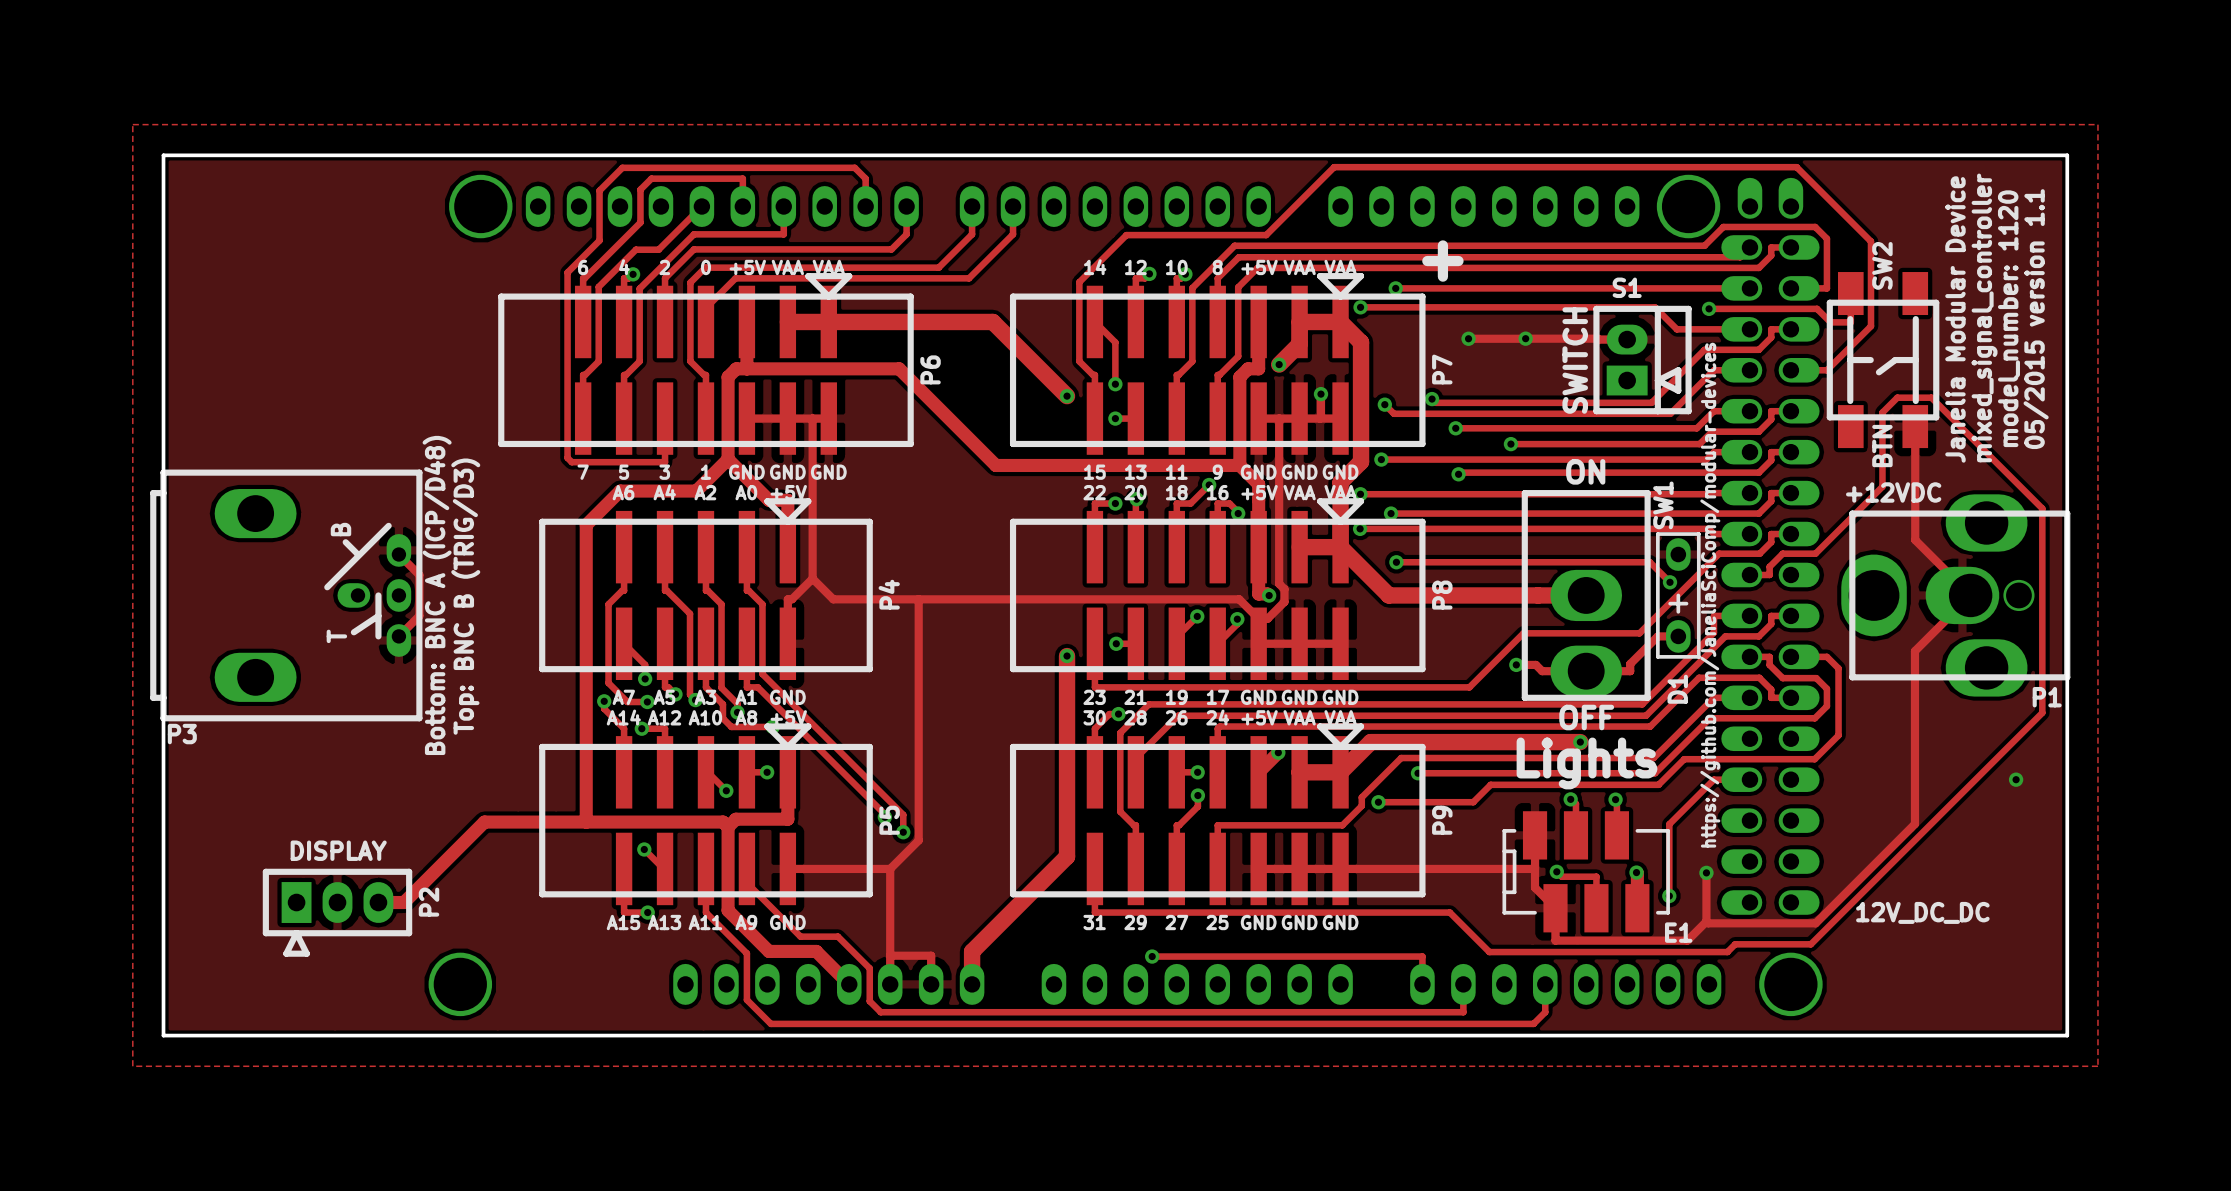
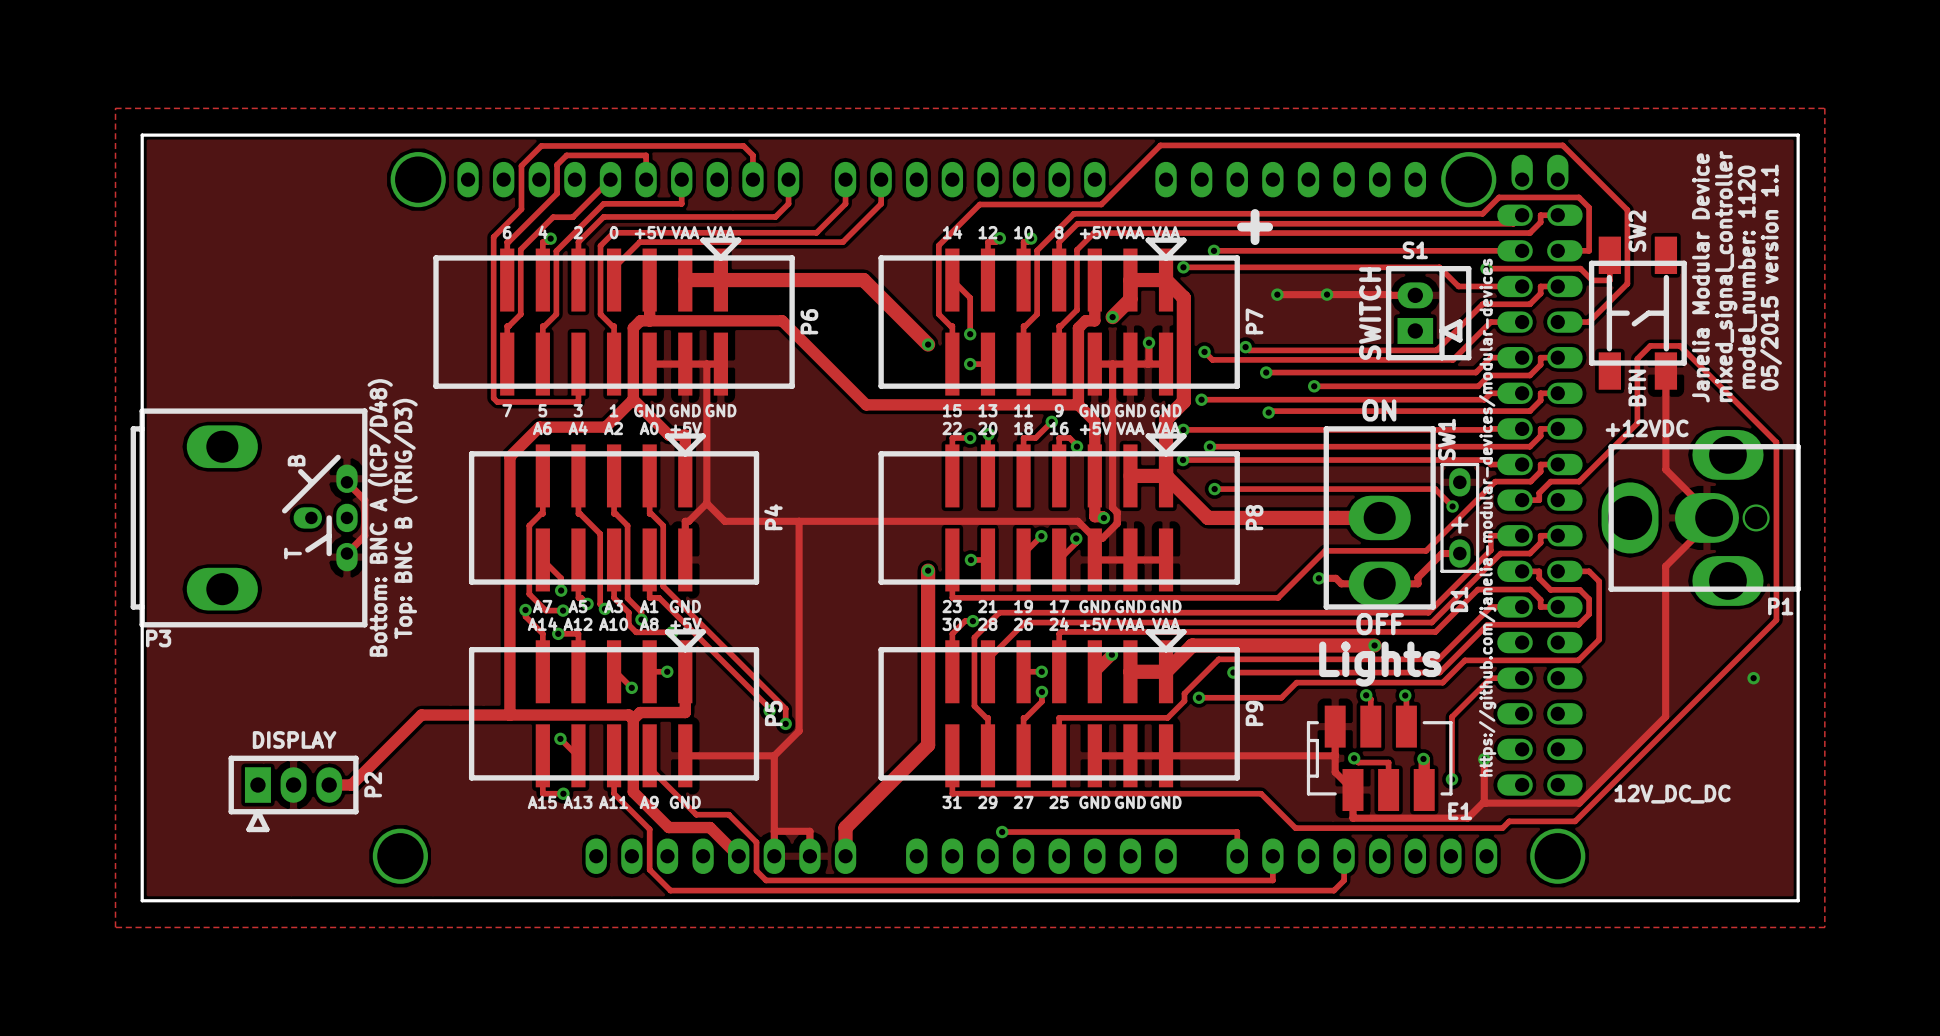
text: https://github.com/JaneliaSciComp/modular-devices (1710, 595) -> https://github.com/janelia-modular-devices/modular-devices (1487, 517)

